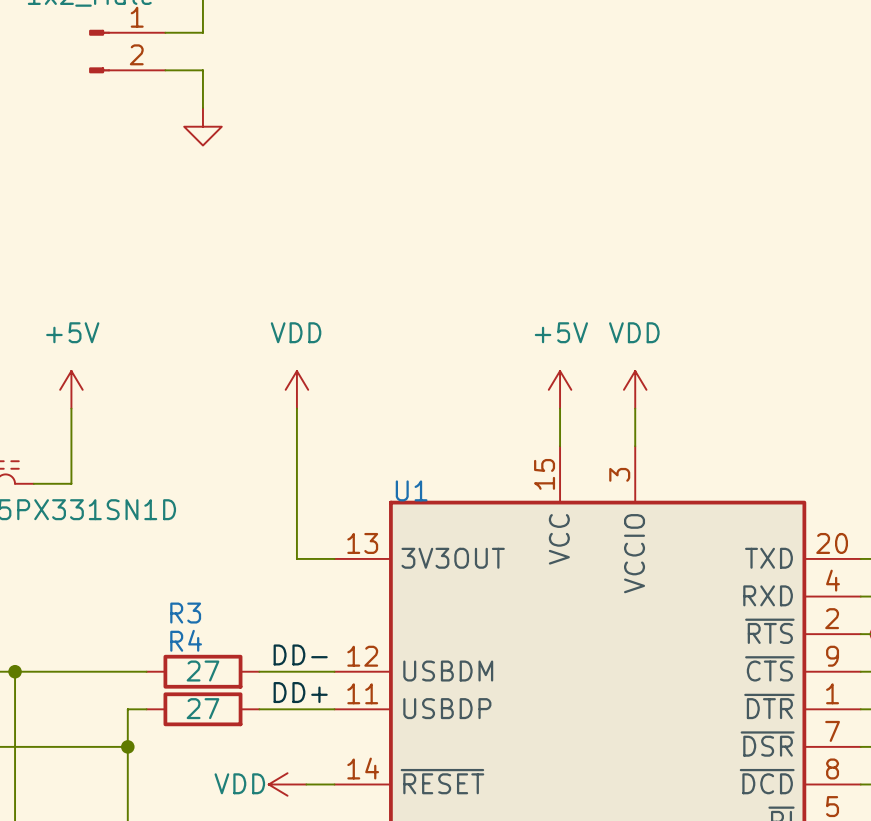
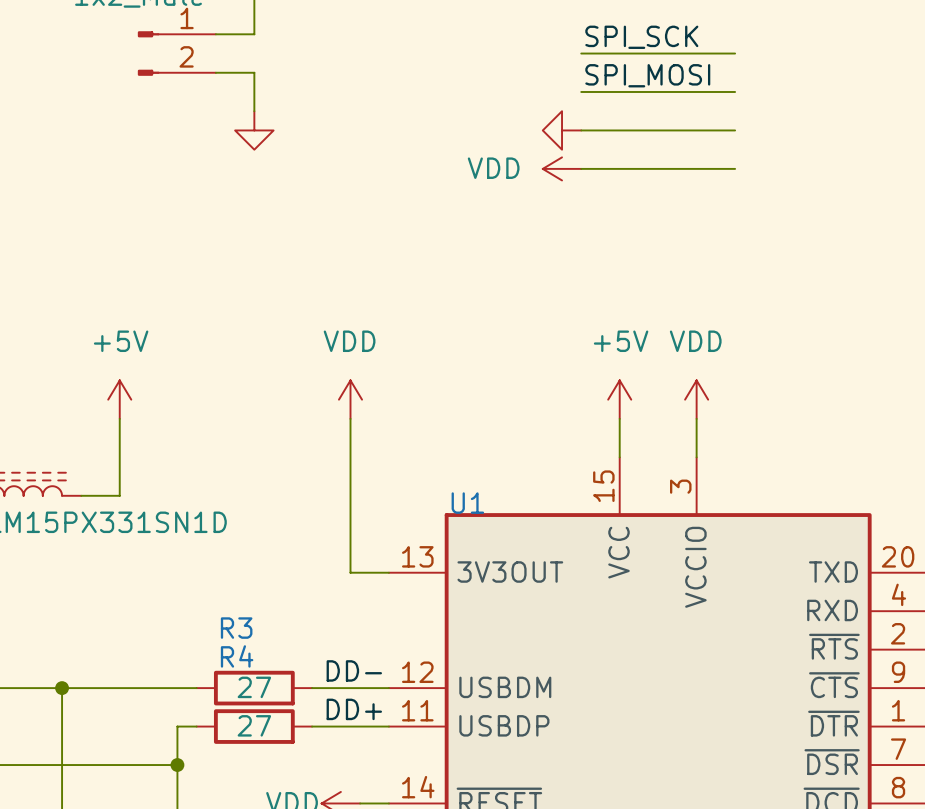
label: none -> SPI_SCK (641, 37)
wire: none -> (581, 53) (735, 53)
label: none -> SPI_MOSI (647, 75)
wire: none -> (581, 91) (735, 91)
power symbol: none -> (562, 130)
wire: none -> (581, 130) (735, 130)
power symbol: none -> VDD (562, 168)
wire: none -> (581, 168) (735, 168)

